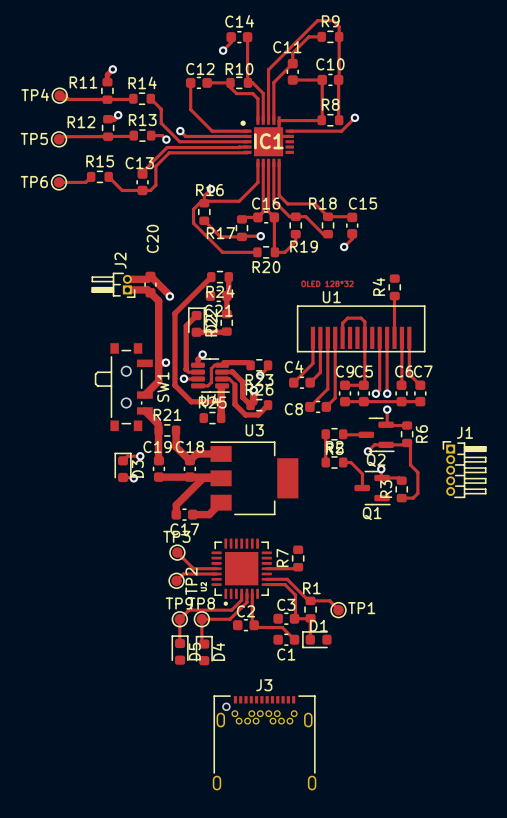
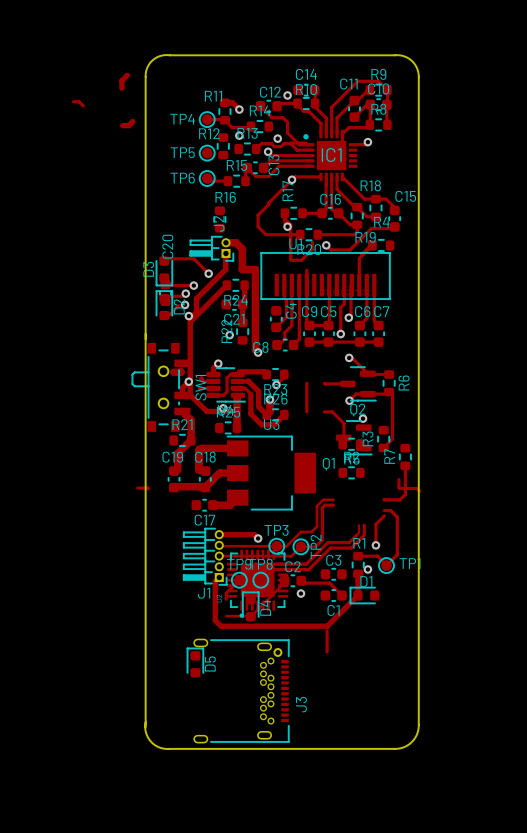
track: (321, 36) (308, 36) (292, 52) (292, 63) (273, 82) (273, 120) -> none
R9 position: (330, 36) -> (378, 90)
track: (231, 37) (231, 42) (223, 50) -> none
C14 position: (239, 37) -> (306, 90)
track: (247, 37) (247, 82) (250, 84) -> none
via: (223, 50) -> none
via: (112, 69) -> none
C11 position: (292, 71) -> (354, 108)
track: (322, 79) (322, 119) (279, 120) (279, 131) (268, 141) -> none
C10 position: (330, 79) -> (378, 104)
track: (292, 80) (322, 80) -> none
R11 name position: R11 (83, 82) -> R11 (213, 96)
track: (190, 82) (190, 109) (212, 131) (247, 131) -> none
C12 position: (198, 82) -> (268, 106)
track: (207, 82) (230, 82) (230, 87) (236, 93) (252, 93) (257, 98) (257, 120) -> none
R10 position: (239, 82) -> (306, 103)
track: (247, 82) (252, 82) (263, 93) (263, 120) -> none
track: none -> (314, 90) (315, 106) (326, 118) (326, 134)
track: none -> (369, 90) (357, 100) (354, 100) (337, 118) (337, 134)
via: none -> (287, 95)
R11 position: (107, 90) -> (224, 111)
TP4 position: (59, 95) -> (207, 119)
track: none -> (224, 102) (232, 102) (239, 109)
track: (133, 98) (60, 99) -> none
R14 position: (142, 98) -> (259, 126)
track: (150, 98) (161, 109) (161, 123) (179, 141) (247, 141) -> none
track: none -> (260, 106) (272, 117) (283, 117) (287, 122) (287, 132) (299, 144) (310, 144)
track: none -> (277, 106) (279, 103) (297, 103) (304, 111) (308, 111) (320, 123) (320, 134)
via: none -> (239, 109)
track: none -> (354, 117) (367, 104) (370, 104) (370, 124) (367, 127) (348, 127) (342, 134) (342, 144) (331, 155)
track: none -> (207, 119) (224, 119) (232, 127) (250, 127)
via: (118, 115) -> none
track: (354, 117) (341, 131) (289, 131) -> none
via position: (354, 117) -> (367, 142)
track: none -> (387, 124) (387, 90) (378, 81) (357, 81) (331, 107) (331, 134)
R8 position: (330, 120) -> (378, 124)
track: (339, 120) (339, 26) (333, 20) (317, 20) (268, 69) (268, 120) -> none
R12 name position: R12 (81, 122) -> R12 (209, 133)
R12 position: (108, 127) -> (223, 146)
via: none -> (239, 135)
track: (180, 131) (185, 136) (247, 136) -> none
via: (180, 131) -> none
via: none -> (277, 138)
track: (133, 135) (99, 136) -> none
R13 position: (142, 135) -> (247, 149)
track: (151, 135) (162, 135) (166, 139) -> none
track: (108, 136) (61, 136) (59, 139) -> none
track: none -> (354, 144) (367, 144)
TP5 position: (59, 139) -> (207, 153)
via: (166, 139) -> none
IC1 position: (267, 141) -> (330, 155)
track: none -> (256, 149) (261, 143) (271, 143) (274, 146) (290, 143) (297, 150) (310, 150)
track: none -> (268, 151) (271, 155) (310, 155)
via: none -> (268, 151)
track: (247, 147) (167, 147) (142, 172) -> none
track: (247, 152) (169, 152) (155, 166) (155, 185) (150, 190) (122, 190) (108, 176) -> none
track: none -> (310, 160) (270, 160) (263, 167)
track: none -> (310, 166) (279, 166) (268, 176) (255, 176) (247, 167) (245, 181)
track: (257, 162) (257, 182) (239, 201) (204, 201) -> none
track: (263, 162) (263, 212) (257, 217) (242, 217) -> none
track: (268, 162) (268, 205) -> none
track: (273, 162) (273, 200) (289, 216) (305, 216) (323, 234) (328, 234) -> none
track: (279, 162) (279, 195) (287, 203) (315, 203) (328, 216) (352, 217) -> none
track: none -> (320, 176) (294, 176) (258, 215) (258, 226) (266, 234) (300, 234)
track: none -> (326, 176) (326, 209) (322, 213) (302, 213)
track: none -> (331, 176) (331, 209) (350, 224) (357, 224) (357, 232) (354, 234) (317, 234)
track: none -> (337, 176) (337, 189) (366, 216) (375, 216)
track: none -> (342, 176) (364, 199) (386, 199) (394, 207) (394, 210)
track: none -> (207, 178) (209, 181) (227, 181)
via: none -> (291, 179)
track: (91, 176) (85, 182) (59, 182) -> none
R15 position: (99, 176) -> (236, 181)
TP6 position: (59, 182) -> (207, 178)
C13 rotation: 0° (142, 182) -> 90° clockwise (255, 167)
C13 position: (142, 182) -> (255, 167)
track: (211, 189) (204, 195) (204, 203) (199, 203) (193, 209) (193, 223) (222, 252) (257, 252) -> none
via: (211, 189) -> none
C16 position: (266, 217) -> (330, 213)
track: none -> (394, 226) (371, 228) (350, 249) (330, 249) (326, 245)
track: (204, 220) (220, 236) (260, 236) -> none
R19 position: (295, 225) -> (357, 215)
R18 position: (328, 225) -> (375, 207)
C15 position: (352, 225) -> (394, 218)
R17 rotation: 0° (241, 228) -> 90° clockwise (293, 213)
R17 position: (241, 228) -> (293, 213)
track: none -> (225, 242) (236, 242) (242, 248) (242, 269) (255, 269) (255, 349) (258, 352)
via position: (260, 236) -> (287, 226)
via: none -> (326, 245)
track: none -> (372, 245) (359, 258) (359, 285)
track: none -> (225, 253) (225, 269) (196, 298) (196, 312) (192, 316) (188, 316)
via: (344, 246) -> none
R20 position: (266, 252) -> (308, 234)
track: none -> (164, 261) (166, 258) (193, 258) (208, 273)
track: none -> (306, 270) (306, 322) (309, 325) (329, 324)
via: none -> (208, 273)
track: none -> (164, 277) (172, 285) (193, 285)
track: none -> (291, 285) (291, 325) (284, 332) (284, 339) (279, 345) (276, 344)
track: none -> (299, 285) (299, 339) (293, 344)
track: none -> (329, 285) (329, 324)
track: none -> (344, 285) (344, 303) (340, 307) (340, 334)
track: none -> (351, 285) (351, 315) (348, 317)
track: none -> (366, 285) (366, 318) (359, 325)
track: none -> (374, 285) (374, 321) (378, 325)
via: none -> (193, 285)
track: none -> (285, 285) (286, 317) (276, 327)
track: (127, 279) (147, 279) (150, 276) (169, 296) -> none
J2 position: (113, 285) -> (211, 248)
track: none -> (185, 293) (183, 296) (166, 296) (164, 298)
via: none -> (185, 293)
R4 rotation: 0° (394, 287) -> 90° clockwise (381, 245)
R4 position: (394, 287) -> (381, 245)
track: (127, 289) (147, 289) (158, 301) (158, 381) (144, 395) -> none
track: (394, 296) (394, 337) -> none
track: none -> (178, 305) (168, 315) (164, 315)
via: none -> (188, 316)
via: none -> (348, 317)
track: (196, 315) (186, 325) (186, 369) -> none
D2 position: (196, 322) -> (164, 305)
via: none -> (340, 334)
via: none -> (229, 335)
U1 position: (361, 328) -> (325, 276)
track: (196, 332) (226, 332) -> none
track: none -> (309, 342) (378, 342)
track: (312, 337) (312, 363) (293, 382) -> none
track: (320, 337) (320, 372) (310, 382) -> none
track: (327, 337) (327, 389) (309, 406) -> none
track: (335, 337) (335, 398) (326, 406) -> none
track: (342, 337) (342, 323) (347, 318) (361, 318) (364, 321) (364, 384) (345, 385) -> none
track: (379, 337) (379, 389) (375, 393) -> none
track: (387, 337) (387, 393) -> none
track: (401, 337) (401, 385) -> none
track: (409, 337) (409, 374) (420, 385) -> none
via: none -> (258, 352)
track: none -> (349, 357) (352, 357) (368, 374) (389, 374)
via: none -> (349, 357)
via: (165, 362) -> none
track: none -> (188, 381) (182, 388) (182, 395)
via: none -> (188, 381)
via: (183, 378) -> none
C4 rotation: 0° (301, 382) -> 90° clockwise (276, 319)
C4 position: (301, 382) -> (276, 319)
SW1 position: (123, 387) -> (161, 387)
track: none -> (349, 400) (356, 394) (387, 394) (389, 392) (392, 395) (392, 439) (383, 447)
via: none -> (349, 400)
C9 position: (345, 393) -> (309, 333)
C5 position: (363, 393) -> (328, 333)
via: (375, 393) -> none
via: (387, 393) -> none
C6 position: (401, 393) -> (359, 333)
C7 position: (420, 393) -> (378, 333)
via: none -> (223, 408)
track: none -> (182, 411) (191, 420) (191, 440) (177, 453) (177, 470)
track: (345, 401) (420, 401) -> none
C8 position: (318, 406) -> (285, 345)
via: none -> (363, 418)
track: (387, 409) (386, 425) (407, 425) -> none
via: (387, 409) -> none
track: (144, 410) (158, 424) (158, 460) -> none
track: (176, 430) (176, 446) (189, 460) (196, 453) (221, 453) -> none
track: (325, 434) (325, 462) -> (306, 383) (306, 411)
track: (343, 434) (366, 434) -> (324, 383) (347, 383)
Q2 position: (376, 434) -> (358, 383)
R6 position: (407, 434) -> (389, 383)
track: none -> (200, 448) (199, 470)
track: none -> (237, 448) (202, 448) (199, 451)
track: (367, 451) (374, 444) (405, 444) (407, 442) (410, 446) (410, 464) (417, 472) (417, 493) (413, 498) (401, 498) -> none
via: (367, 451) -> none
track: none -> (405, 465) (405, 494) (400, 499) (384, 499)
track: (140, 456) (127, 456) (123, 460) -> none
via: (140, 456) -> none
track: none -> (237, 473) (219, 473) (205, 486) (177, 486)
track: (343, 462) (350, 462) (362, 474) (362, 488) -> (324, 411) (332, 411) (343, 423) (343, 437)
D3 rotation: 0° (123, 467) -> 180° (164, 271)
D3 position: (123, 467) -> (164, 271)
via: (381, 469) -> none
J1 rotation: 0° (464, 469) -> 180° (205, 556)
J1 position: (464, 469) -> (205, 556)
track: (158, 477) (221, 478) (203, 478) (176, 505) (176, 514) -> none
via: (133, 478) -> none
U3 position: (254, 478) -> (271, 473)
track: none -> (237, 497) (230, 505) (212, 505)
Q1 position: (372, 488) -> (354, 437)
track: none -> (333, 499) (323, 499) (317, 506) (317, 526) (311, 531) (300, 531) (286, 546) (219, 545)
R3 position: (401, 489) -> (383, 439)
track: none -> (333, 505) (325, 505) (322, 507) (322, 540) (315, 546)
track: none -> (384, 510) (390, 510) (397, 517) (397, 554) (386, 565)
track: (221, 502) (209, 514) (192, 514) -> none
track: none -> (384, 515) (375, 524) (375, 545)
Q1 name position: Q1 (372, 513) -> Q1 (328, 464)
C17 position: (184, 514) -> (204, 505)
track: none -> (358, 525) (358, 532) (349, 542) (327, 542) (306, 564) (255, 564) (226, 593) (226, 599)
track: none -> (364, 525) (364, 535) (351, 548) (330, 548) (308, 569) (271, 569) (250, 590) (250, 599)
track: none -> (219, 534) (254, 534) (258, 538)
via: none -> (258, 538)
via: none -> (375, 545)
track: none -> (315, 546) (300, 546) (290, 556) (219, 556)
track: none -> (356, 556) (377, 556) (384, 563)
track: (177, 552) (193, 568) (216, 568) -> none
TP3 position: (177, 552) -> (276, 546)
R7 position: (298, 558) -> (405, 456)
via: none -> (367, 569)
track: none -> (357, 574) (357, 595) (327, 626) (221, 626) (215, 620) (215, 581) (219, 577)
track: none -> (299, 578) (303, 583) (329, 583) (342, 595)
track: (298, 567) (266, 568) -> none
track: none -> (284, 580) (250, 616) (226, 616)
track: (216, 574) (183, 574) (176, 580) -> none
track: (266, 579) (287, 579) (308, 600) (329, 600) (336, 607) -> none
TP2 position: (176, 580) -> (300, 546)
via: none -> (300, 593)
track: (266, 584) (285, 584) (295, 595) (294, 618) (310, 618) -> none
track: (241, 593) (241, 600) (231, 610) (188, 610) (179, 619) (180, 643) -> none
track: (246, 593) (246, 602) (230, 619) (201, 619) (201, 641) (204, 644) -> none
track: (252, 593) (252, 623) (256, 627) (282, 627) (294, 639) -> none
R1 position: (310, 609) -> (358, 565)
TP1 position: (338, 610) -> (386, 565)
C3 position: (286, 618) -> (333, 574)
TP9 position: (179, 619) -> (239, 580)
TP8 position: (201, 619) -> (260, 580)
C2 position: (245, 625) -> (292, 580)
C1 position: (286, 639) -> (333, 595)
D1 position: (316, 639) -> (364, 595)
D4 position: (204, 650) -> (250, 606)
board edge: none -> (145, 722) (145, 724) (145, 727) (145, 732) (150, 741) (159, 747) (167, 749) (397, 748) (409, 743) (417, 732) (418, 76) (414, 64) (404, 56) (164, 55) (152, 60) (146, 68) (145, 727)
J3 rotation: 0° (264, 742) -> 90° clockwise (241, 691)
J3 position: (264, 742) -> (241, 691)

